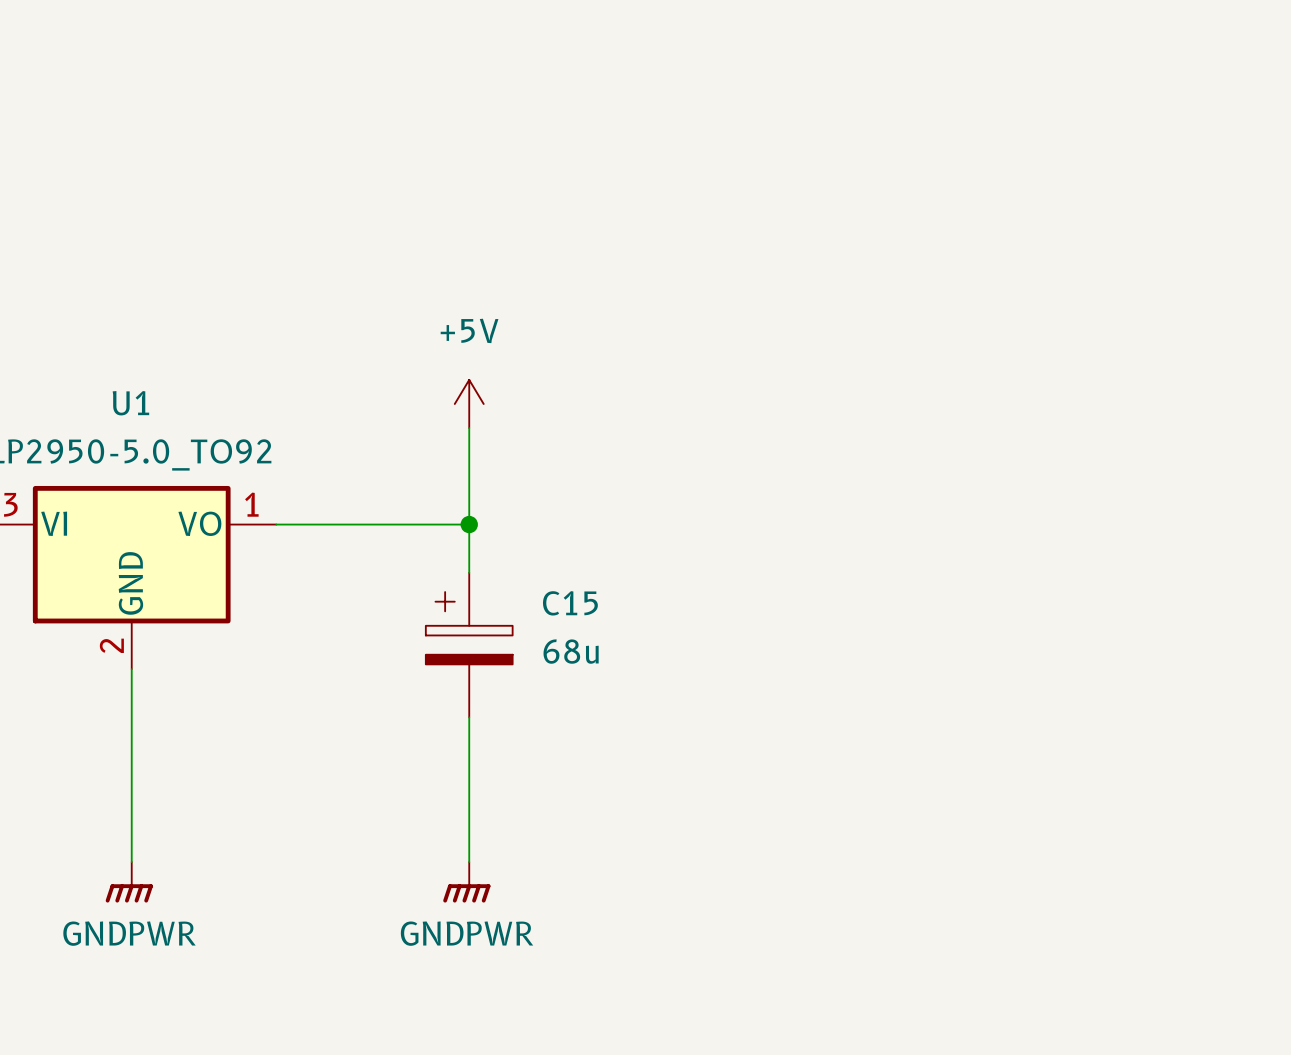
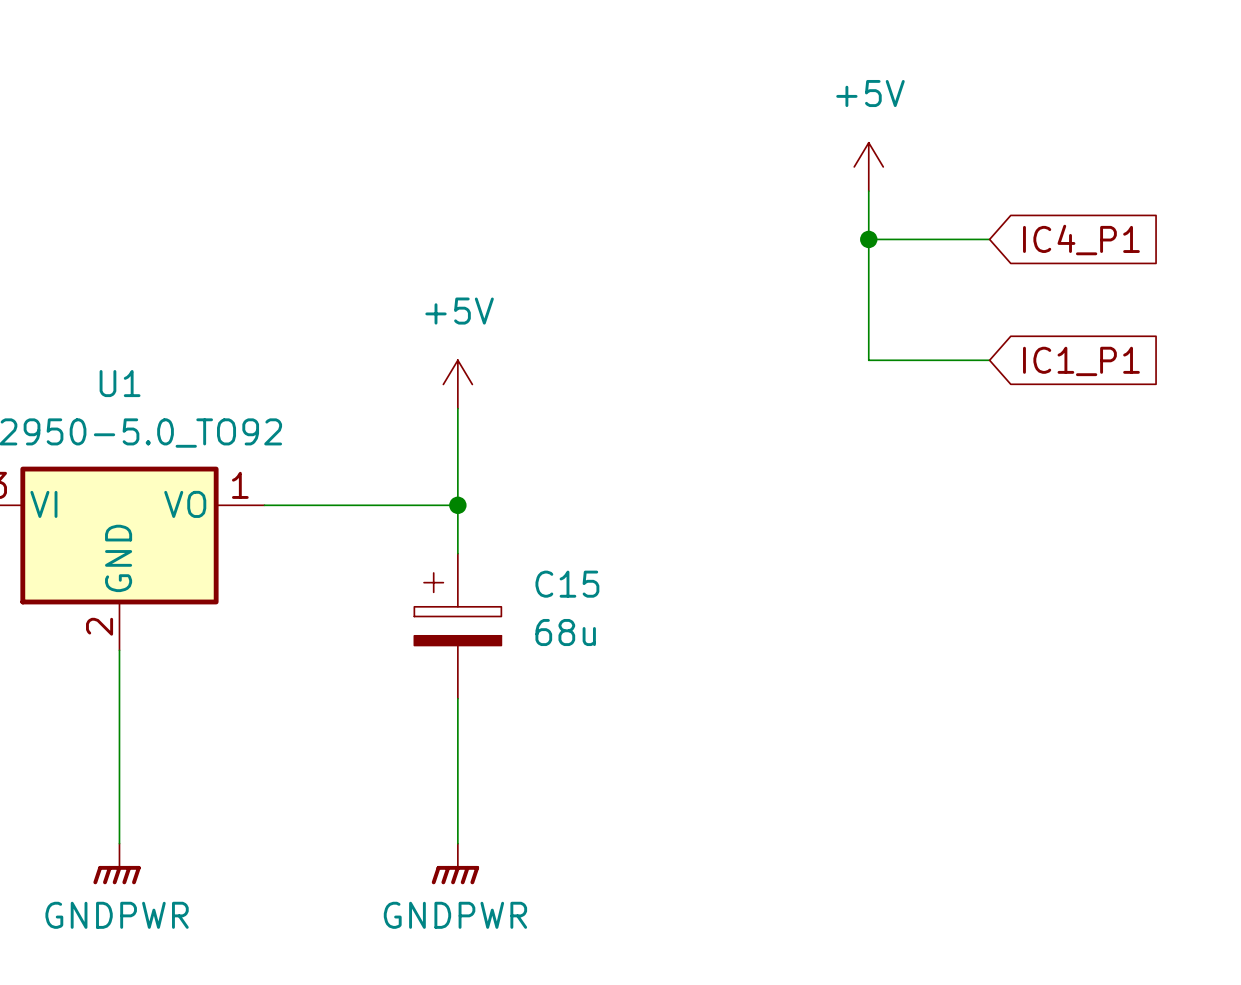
power symbol: none -> +5V (868, 166)
wire: none -> (868, 191) (868, 360) (989, 360)
wire: none -> (868, 239) (989, 239)
junction: none -> (868, 239)
global label: none -> IC4_P1 (1081, 240)
global label: none -> IC1_P1 (1081, 361)

